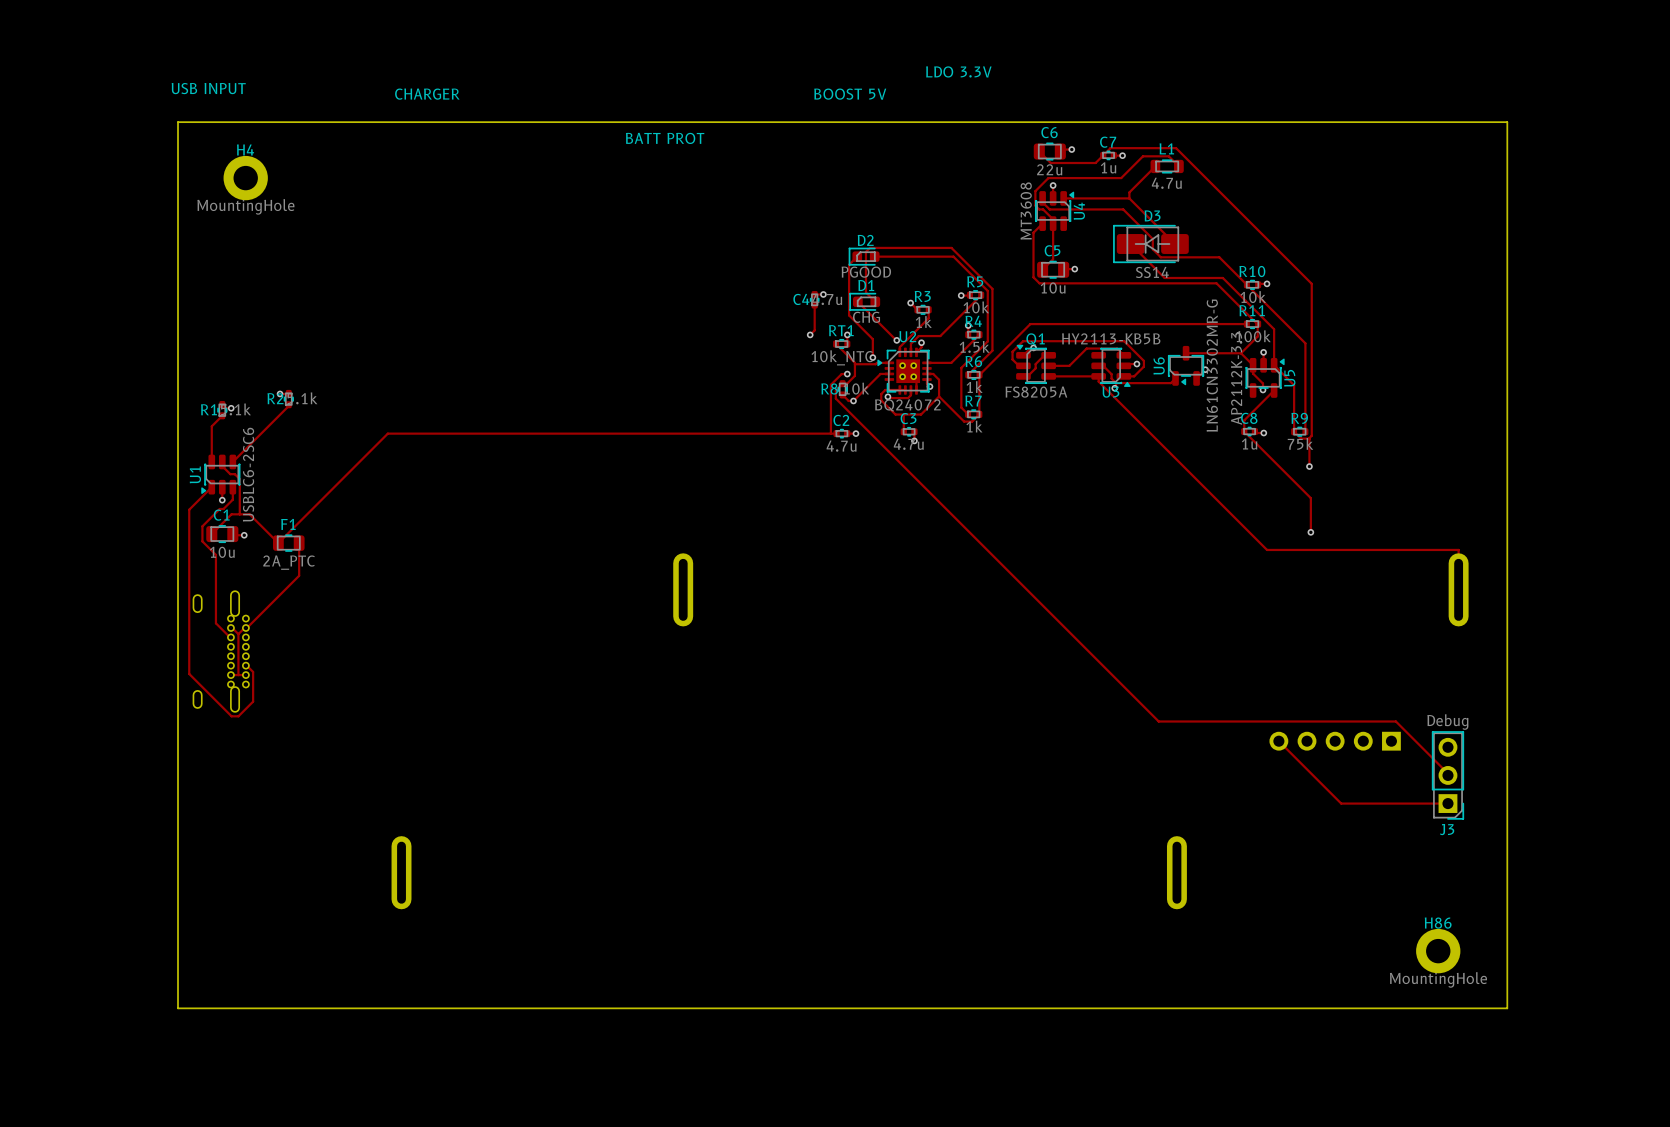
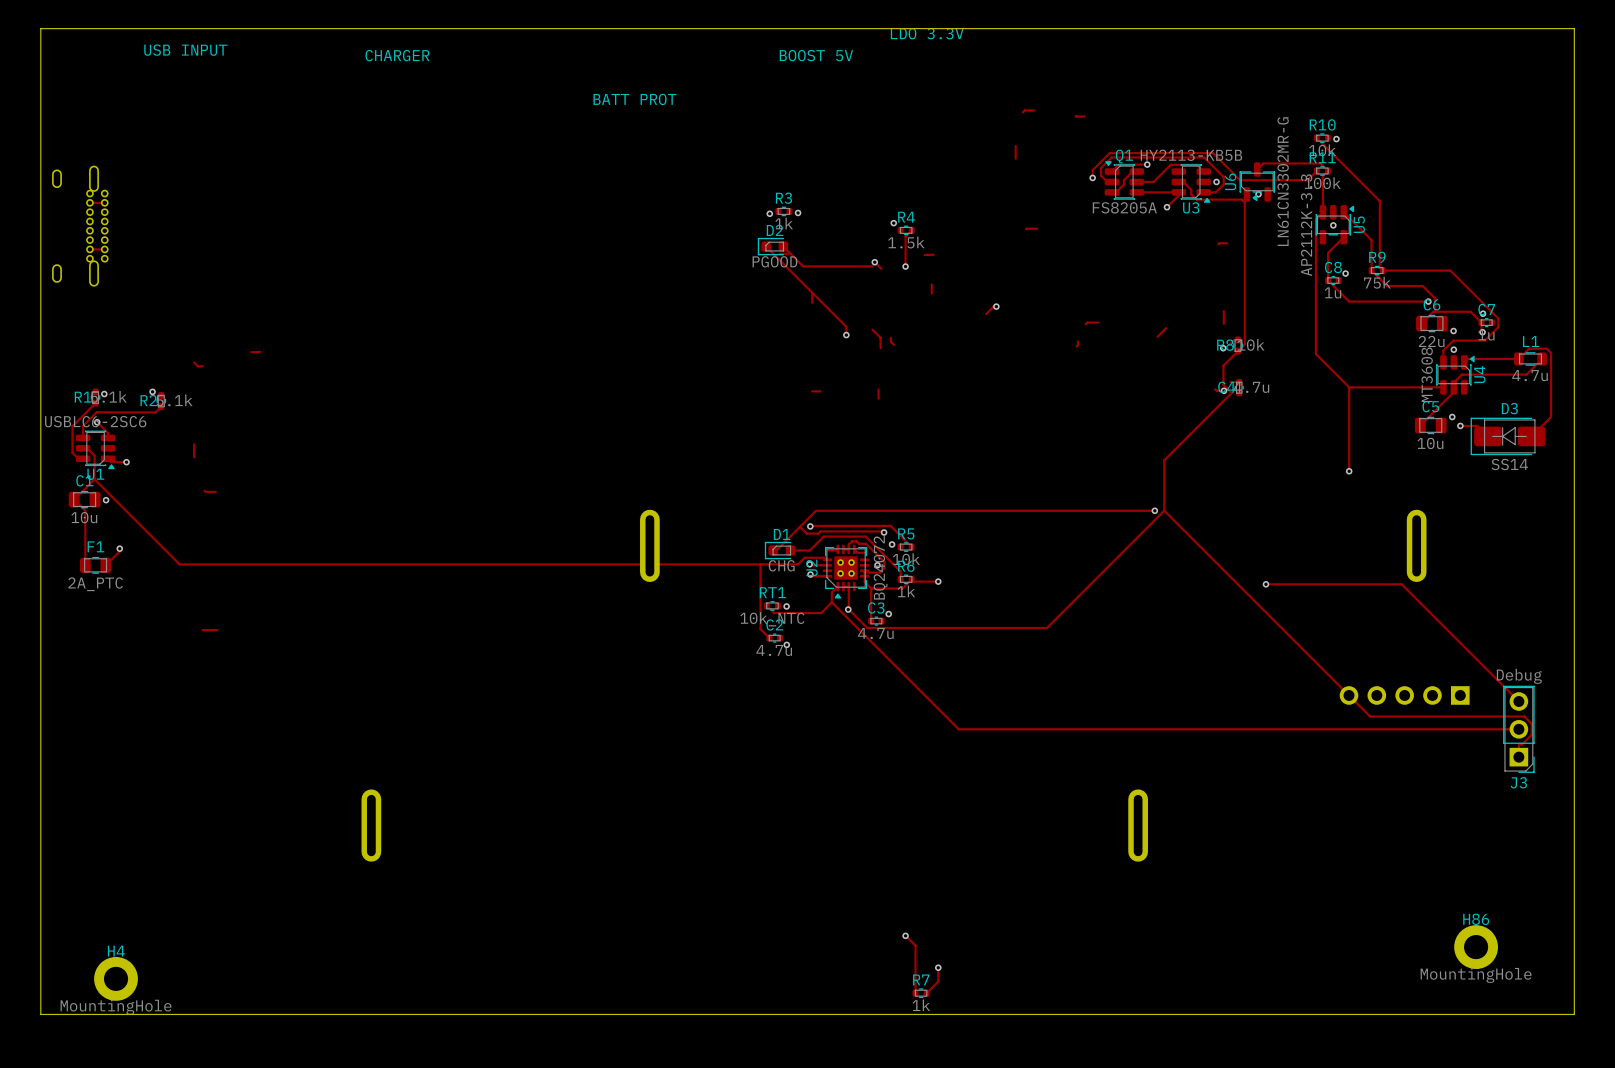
board edge: (178, 122) (1507, 122) (1507, 1008) (178, 1008) (178, 122) -> (40, 28) (40, 1014) (1574, 1014) (1574, 28) (40, 28)
via: (1071, 149) -> none
track: (1039, 151) (1050, 163) (1095, 163) (1110, 148) (1176, 148) (1311, 283) (1311, 435) (1308, 438) -> none
C6 position: (1049, 151) -> (1431, 323)
C7 position: (1108, 155) -> (1486, 322)
via: (1122, 155) -> none
track: (1155, 166) (1129, 192) (1129, 198) -> none
L1 position: (1167, 166) -> (1530, 358)
track: (1178, 166) (1168, 156) (1143, 156) (1121, 178) (1048, 178) (1035, 191) (1035, 205) (1039, 209) (1043, 209) (1053, 219) (1053, 259) (1042, 269) -> none
track: none -> (1316, 138) (1379, 201) (1379, 267) (1382, 270) (1450, 270) (1498, 318) (1498, 327) (1484, 340) (1453, 340) (1443, 350) (1443, 362)
H4 position: (245, 178) -> (116, 978)
via: none -> (1336, 139)
via: (1053, 185) -> none
track: (1042, 198) (1042, 202) (1049, 209) (1123, 209) (1152, 239) (1152, 249) (1160, 257) (1219, 257) (1305, 343) (1305, 431) -> none
track: (1063, 198) (1129, 198) -> none
track: (1129, 198) (1174, 244) -> none
track: none -> (1147, 164) (1118, 164) (1111, 171)
via: none -> (1147, 164)
track: none -> (1257, 169) (1263, 163) (1320, 163) (1327, 171) (1322, 176) (1322, 212) (1315, 219) (1315, 354) (1349, 387)
track: none -> (1316, 171) (1307, 180) (1240, 180) (1212, 153) (1109, 153) (1092, 170) (1092, 177)
U4 position: (1054, 211) -> (1455, 374)
track: none -> (1203, 171) (1196, 164) (1170, 164) (1153, 181) (1136, 181)
via: none -> (1092, 177)
track: none -> (1111, 181) (1107, 181) (1101, 175) (1101, 167) (1111, 157) (1204, 157) (1223, 177) (1223, 184) (1215, 192) (1203, 192)
track: none -> (1178, 181) (1183, 181) (1191, 189) (1191, 194) (1196, 199) (1241, 199) (1244, 202) (1244, 344) (1223, 365) (1223, 384) (1231, 392) (1164, 460) (1164, 510)
via: none -> (1216, 181)
track: (1042, 223) (1033, 232) (1033, 277) (1039, 283) (1216, 283) (1257, 324) -> none
track: none -> (1136, 192) (1178, 192) (1178, 195) (1166, 207)
via: none -> (1258, 194)
track: none -> (89, 202) (104, 202)
track: (1130, 244) (1164, 277) (1222, 277) (1274, 329) (1274, 365) (1294, 385) (1294, 431) (1301, 438) (1308, 438) -> none
D3 position: (1151, 244) -> (1507, 436)
via: none -> (1166, 207)
track: none -> (1343, 212) (1371, 240) (1371, 270) (1387, 286) (1422, 286) (1435, 298) (1435, 311)
via: none -> (798, 212)
via: none -> (769, 213)
track: (857, 256) (849, 264) (849, 315) (872, 339) (872, 357) -> none
D2 position: (864, 256) -> (772, 246)
track: (874, 256) (953, 256) (987, 290) (987, 341) (961, 367) (961, 407) (968, 414) -> none
via: none -> (893, 223)
via: none -> (1333, 225)
part: none -> (80, 226)
C5 position: (1053, 269) -> (1430, 425)
via: (1074, 269) -> none
track: none -> (911, 230) (905, 236) (905, 266)
track: none -> (1343, 237) (1328, 252) (1328, 280) (1349, 301) (1428, 301)
via: (1267, 283) -> none
R10 position: (1252, 284) -> (1322, 138)
track: none -> (766, 246) (846, 326) (846, 335)
track: none -> (783, 246) (803, 266) (872, 266)
track: none -> (89, 249) (104, 249)
via: (823, 294) -> none
via: (961, 295) -> none
R5 position: (975, 295) -> (906, 547)
track: (981, 295) (940, 336) (918, 336) (910, 343) (910, 352) -> none
C4 position: (814, 299) -> (1239, 387)
track: (857, 301) (896, 340) -> none
D1 position: (864, 301) -> (780, 550)
track: (875, 301) (865, 292) (865, 251) (869, 247) (951, 247) (992, 288) (992, 350) (968, 374) -> none
track: (814, 305) (814, 330) (810, 334) -> none
via: none -> (905, 266)
R3 position: (923, 309) -> (783, 211)
track: (928, 309) (928, 318) (899, 347) (899, 352) -> none
via: none -> (1345, 273)
track: (1246, 324) (1030, 324) (979, 375) (979, 414) (972, 421) (964, 421) (939, 396) -> none
R11 position: (1252, 324) -> (1322, 171)
track: (1257, 324) (1257, 336) (1241, 353) -> none
via: (968, 325) -> none
via: (810, 334) -> none
via: (847, 334) -> none
R4 position: (973, 334) -> (906, 230)
track: (979, 334) (951, 362) (926, 362) -> none
via: (896, 340) -> none
track: (921, 342) (921, 347) (916, 352) -> none
via: (921, 342) -> none
via: none -> (1428, 301)
track: (836, 344) (854, 362) (854, 375) (835, 390) (835, 398) (1158, 721) (1395, 721) (1447, 775) -> none
RT1 position: (841, 344) -> (772, 605)
via: (1263, 352) -> none
track: (1186, 353) (1241, 353) -> none
track: (1241, 353) (1253, 365) (1253, 373) (1263, 383) (1263, 389) -> none
track: (1048, 355) (1044, 355) (1035, 364) (1035, 368) (1027, 376) (1023, 376) -> (1136, 171) (1132, 171) (1123, 180) (1123, 184) (1115, 192) (1111, 192)
track: (1123, 355) (1117, 348) (1086, 348) (1069, 365) (1048, 365) -> none
via: none -> (1483, 313)
via: (872, 357) -> none
track: (889, 362) (854, 364) -> none
Q1 position: (1036, 364) -> (1124, 180)
via: (1136, 364) -> none
track: (1023, 365) (1018, 365) (1012, 359) (1012, 351) (1023, 341) (1124, 341) (1143, 360) (1143, 366) (1134, 376) (1123, 376) -> none
track: (1098, 365) (1103, 365) (1111, 374) (1111, 378) (1116, 383) (1170, 383) (1175, 378) -> none
U6 position: (1186, 365) -> (1257, 181)
track: none -> (1421, 323) (1433, 311) (1470, 311) (1481, 322) (1482, 332)
U3 position: (1111, 367) -> (1191, 183)
track: (889, 368) (889, 373) (880, 373) (853, 400) (848, 400) (842, 394) -> none
track: (926, 368) (926, 373) (933, 373) (939, 379) (939, 396) -> none
via: (1205, 369) -> none
U2 rotation: 0° (904, 371) -> 90° counterclockwise (846, 571)
U2 position: (904, 371) -> (846, 571)
via: none -> (1453, 331)
via: none -> (1482, 332)
track: (847, 374) (841, 374) (830, 384) (830, 433) -> none
via: (847, 374) -> none
R6 position: (973, 374) -> (906, 579)
via: none -> (846, 335)
track: (1048, 376) (1098, 376) (1098, 381) (1267, 549) (1458, 549) (1458, 589) -> none
U5 position: (1265, 377) -> (1334, 224)
track: none -> (1237, 339) (1234, 339) (1229, 344)
via: (929, 386) -> none
via: (1114, 388) -> none
R8 position: (842, 389) -> (1237, 345)
track: (905, 389) (885, 389) (881, 394) (881, 400) (895, 414) (921, 414) (939, 396) -> none
track: (910, 389) (910, 395) (908, 398) (887, 396) -> none
track: (1274, 390) (1244, 420) (1244, 431) (1310, 498) (1310, 532) -> none
via: none -> (1453, 349)
via: (280, 393) -> none
via: (887, 396) -> none
R2 position: (288, 399) -> (161, 401)
via: (853, 400) -> none
track: none -> (1542, 358) (1526, 374) (1461, 374) (1453, 382) (1453, 392) (1420, 425)
track: (288, 404) (232, 461) -> none
track: none -> (1464, 362) (1467, 358) (1518, 358) (1529, 348) (1546, 348) (1551, 353) (1551, 417) (1531, 436)
via: (231, 408) -> none
R1 position: (222, 410) -> (95, 397)
track: (903, 414) (903, 431) -> none
R7 position: (973, 414) -> (921, 993)
track: (222, 415) (211, 426) (211, 461) -> none
track: none -> (1230, 381) (1239, 382)
track: none -> (1349, 387) (1349, 471)
track: none -> (1349, 387) (1443, 387)
C3 position: (909, 431) -> (876, 621)
C8 position: (1249, 431) -> (1333, 280)
R9 position: (1299, 431) -> (1377, 270)
track: (836, 433) (387, 433) (278, 543) (249, 514) (231, 514) (211, 534) -> none
C2 position: (841, 433) -> (774, 638)
via: (855, 433) -> none
via: none -> (152, 391)
via: none -> (104, 394)
track: (1308, 438) (1309, 466) -> none
via: (914, 440) -> none
track: none -> (95, 403) (72, 426) (72, 452) (78, 458) (83, 458)
track: none -> (161, 406) (155, 412) (96, 412) (83, 425) (83, 437)
via: none -> (1452, 417)
track: (222, 461) (222, 466) (230, 474) (234, 474) (239, 479) (239, 514) -> none
track: none -> (97, 422) (108, 433) (108, 437)
via: none -> (97, 422)
via: (1309, 466) -> none
track: none -> (1460, 425) (1477, 425) (1487, 436)
via: none -> (1460, 425)
U1 rotation: 0° (220, 474) -> 90° counterclockwise (95, 449)
U1 position: (220, 474) -> (95, 449)
track: (211, 487) (189, 509) (189, 673) (231, 716) (238, 716) (253, 701) (253, 671) (245, 665) -> none
track: (232, 487) (232, 499) (223, 508) (219, 508) (202, 526) (202, 541) (215, 554) (215, 623) (230, 637) -> none
track: none -> (83, 448) (87, 448) (94, 455) (94, 479)
via: (222, 500) -> none
track: none -> (108, 458) (111, 462) (126, 462)
via: none -> (126, 462)
via: none -> (1349, 471)
track: none -> (94, 479) (179, 564) (798, 564) (804, 557) (825, 557) (827, 559)
track: none -> (94, 479) (74, 499) (85, 510) (85, 565)
via: (1310, 532) -> none
C1 position: (222, 534) -> (84, 499)
via: (244, 535) -> none
via: none -> (106, 500)
F1 position: (288, 543) -> (95, 565)
track: (299, 543) (299, 575) (238, 634) -> none
track: none -> (1154, 510) (816, 510) (776, 550) (773, 550)
via: none -> (1154, 510)
track: none -> (1164, 510) (1370, 716) (1524, 716) (1531, 723) (1531, 734) (1522, 744) (1518, 744) (1518, 757)
track: none -> (1164, 510) (1046, 627) (867, 627) (848, 609)
track: none -> (799, 526) (806, 533) (818, 533) (820, 531) (884, 532)
track: none -> (810, 526) (890, 525) (911, 547)
via: none -> (810, 526)
via: none -> (884, 532)
via: none -> (892, 544)
track: none -> (119, 548) (119, 551) (105, 565)
via: none -> (119, 548)
track: none -> (837, 549) (828, 550)
track: none -> (843, 549) (848, 549) (848, 544) (851, 541) (866, 543) (884, 562) (884, 568) (879, 572) (864, 572)
track: none -> (854, 549) (857, 552) (865, 552)
track: none -> (790, 550) (809, 550) (823, 536) (865, 536) (900, 571) (900, 579)
track: none -> (760, 564) (760, 629) (769, 638)
track: none -> (809, 564) (827, 565)
via: none -> (809, 564)
via: none -> (877, 565)
track: none -> (864, 570) (864, 582) (871, 588)
track: none -> (810, 574) (812, 576) (827, 576)
via: none -> (810, 574)
track: none -> (938, 581) (913, 581) (911, 579) (902, 588) (871, 588)
via: none -> (938, 581)
track: (230, 627) (238, 634) -> none
track: none -> (1265, 584) (1401, 584) (1518, 701)
via: none -> (1265, 584)
track: none -> (837, 586) (831, 592) (831, 602)
track: none -> (843, 586) (848, 586) (848, 609)
track: none -> (871, 588) (871, 621)
track: (238, 634) (238, 675) -> none
track: none -> (831, 602) (821, 613) (774, 613) (766, 605)
track: none -> (831, 602) (958, 729) (1518, 729)
part: (221, 651) -> none
via: none -> (786, 606)
via: none -> (848, 609)
via: none -> (888, 614)
via: none -> (786, 644)
track: (1278, 741) (1341, 803) (1447, 803) -> none
part position: (1335, 741) -> (1404, 695)
J3 position: (1447, 775) -> (1518, 729)
H86 position: (1438, 951) -> (1476, 947)
track: none -> (905, 935) (915, 945) (915, 993)
via: none -> (905, 935)
track: none -> (938, 967) (938, 981) (926, 993)
via: none -> (938, 967)

